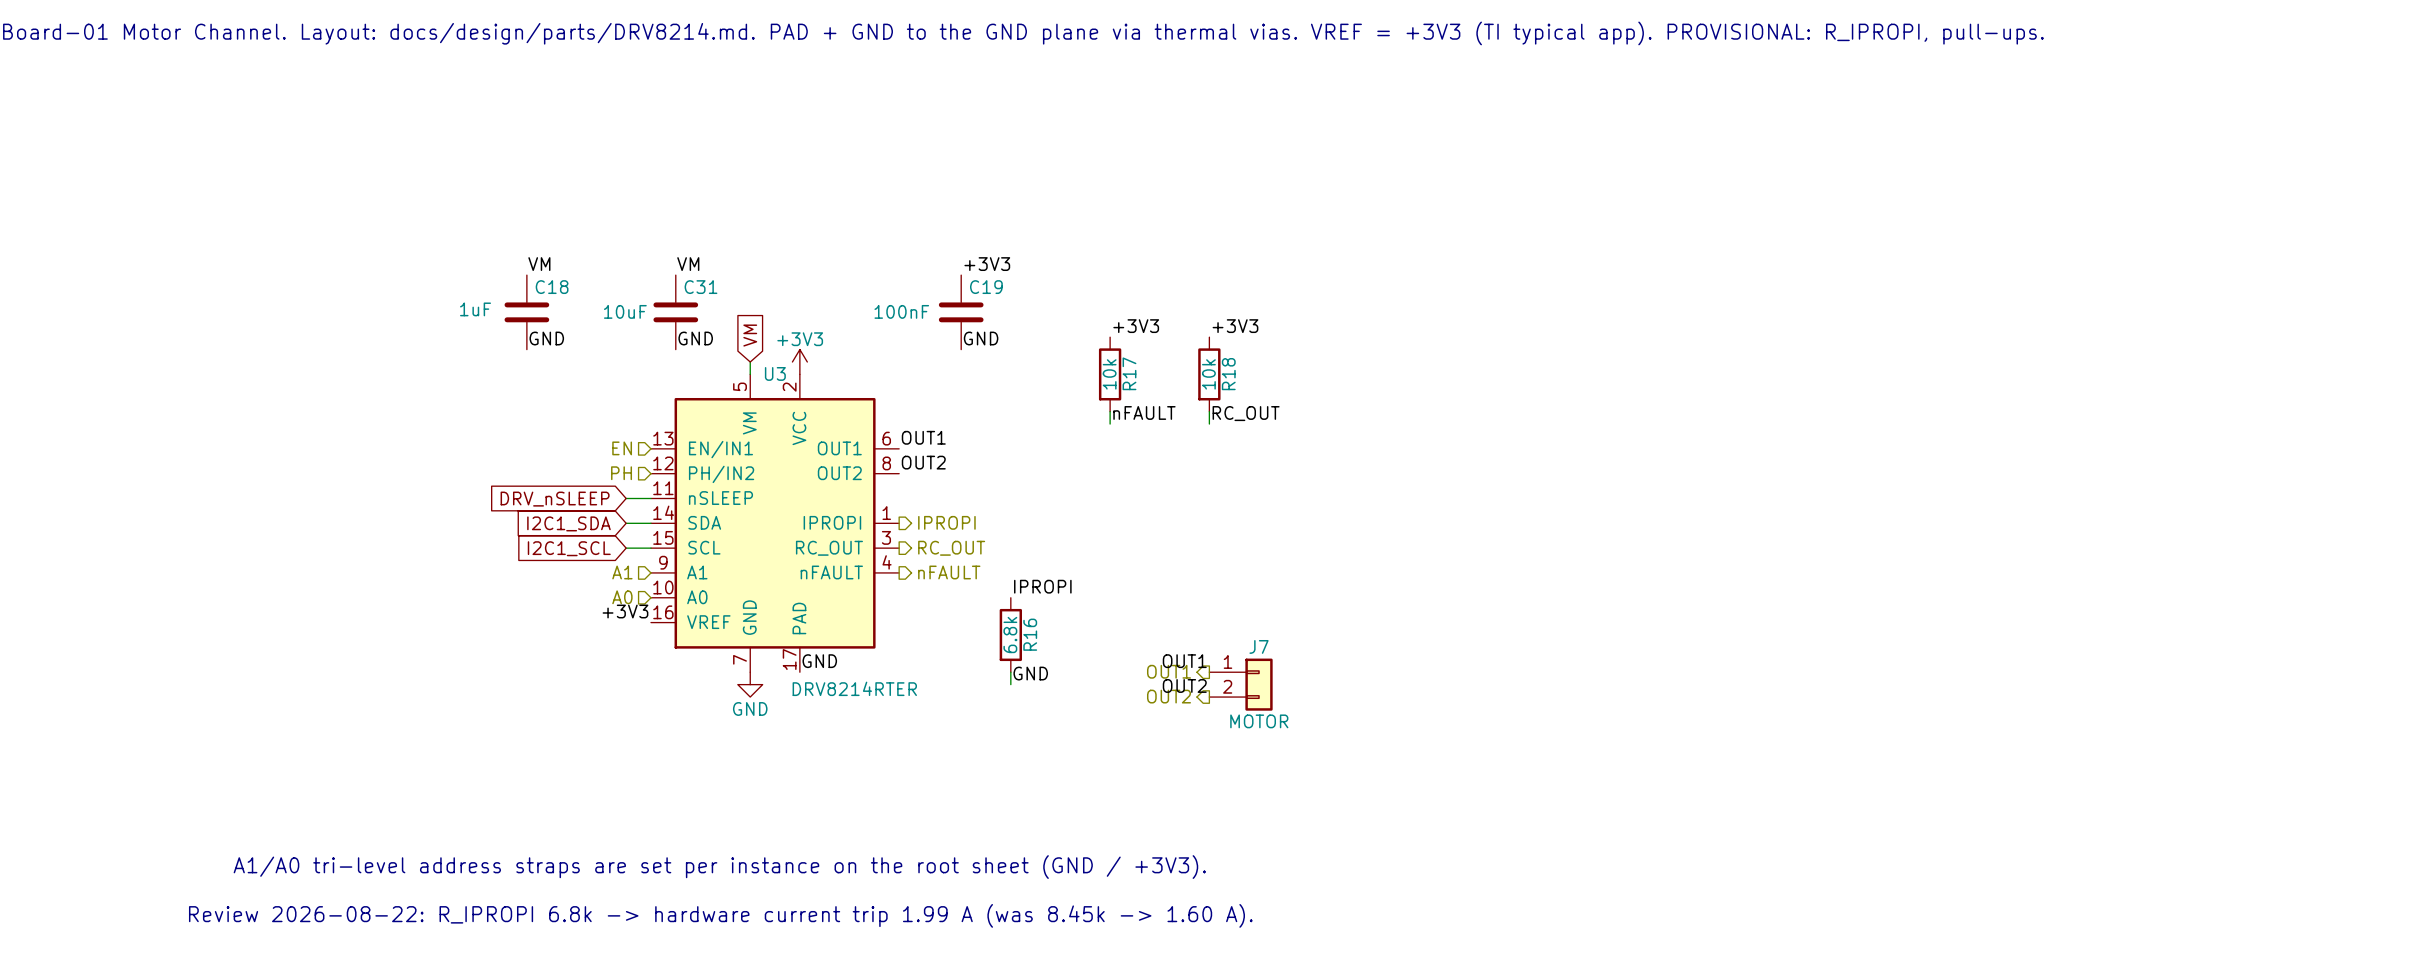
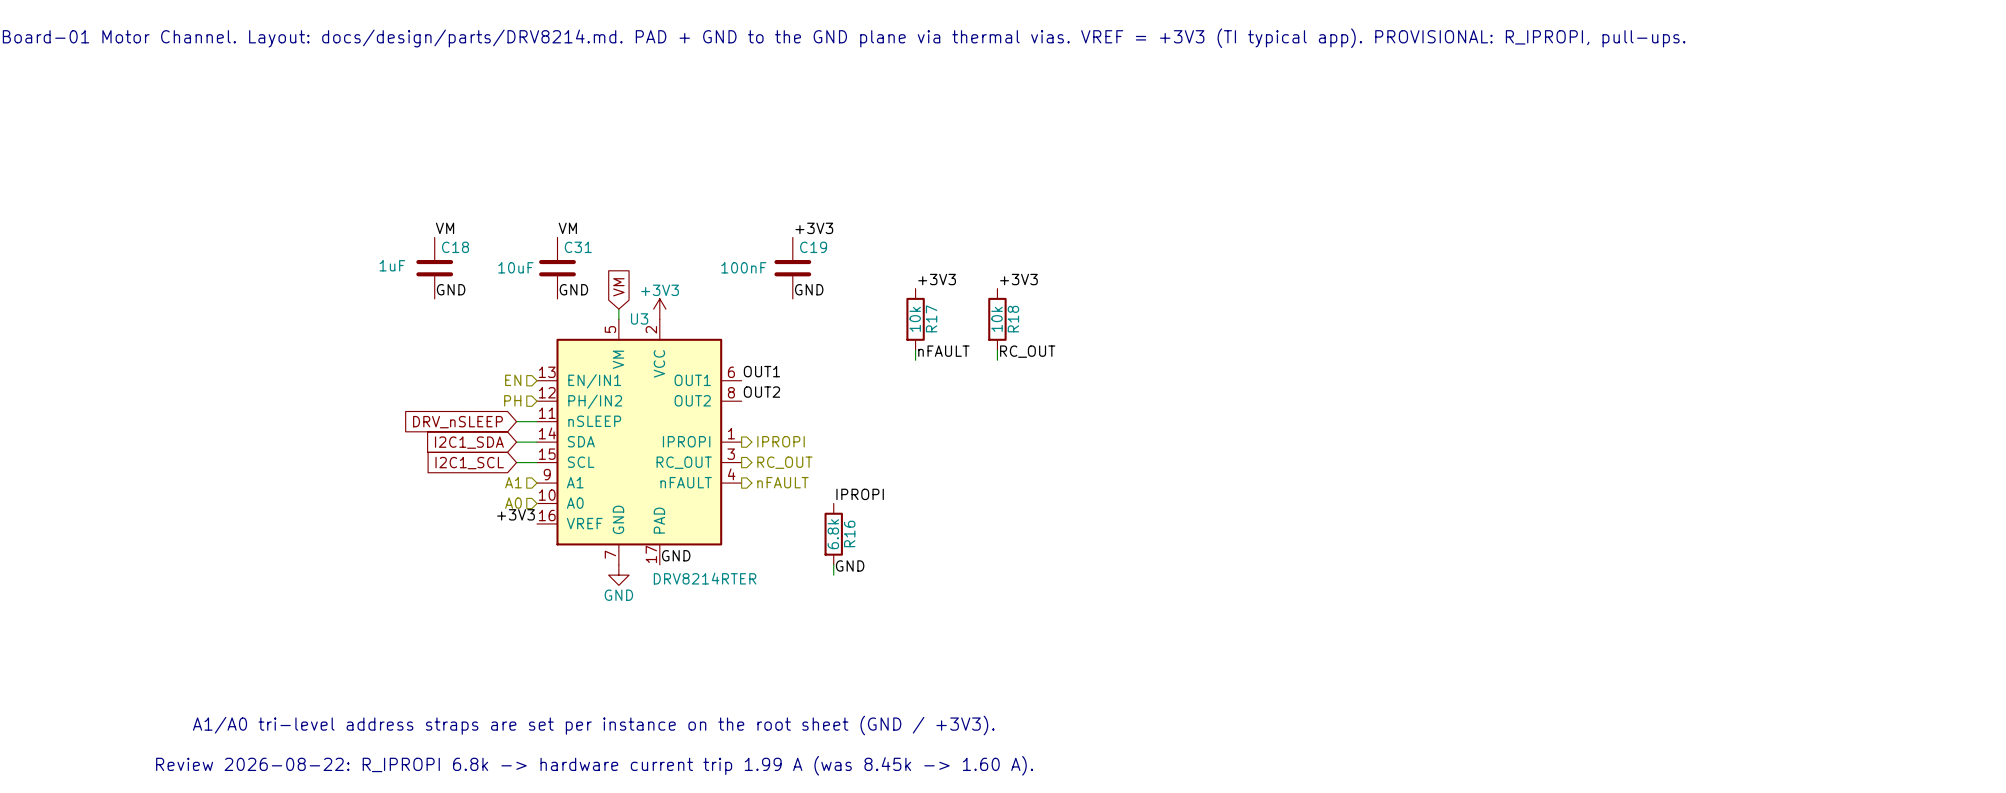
label: OUT1 (1184, 661) -> none
hierarchical label: OUT1 (1169, 671) -> none
J7: MOTOR (1241, 684) -> none
label: OUT2 (1184, 685) -> none
hierarchical label: OUT2 (1169, 696) -> none

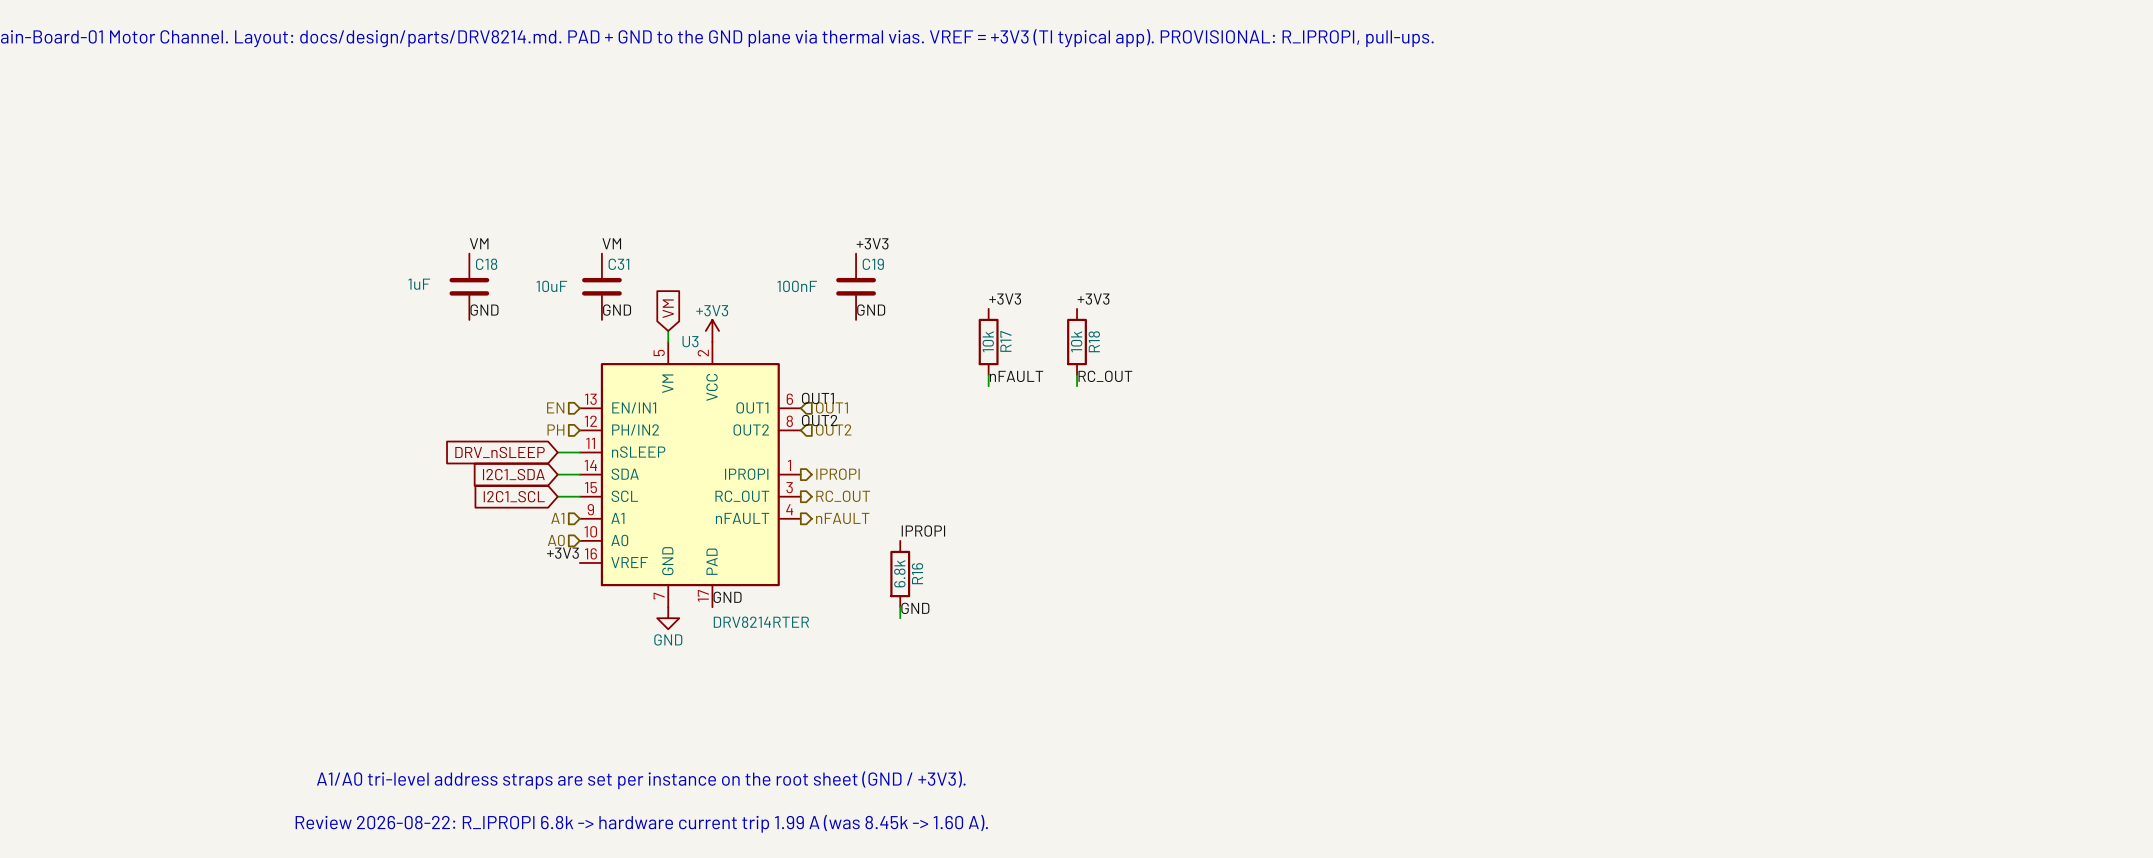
hierarchical label: none -> OUT1 (831, 407)
hierarchical label: none -> OUT2 (833, 430)

